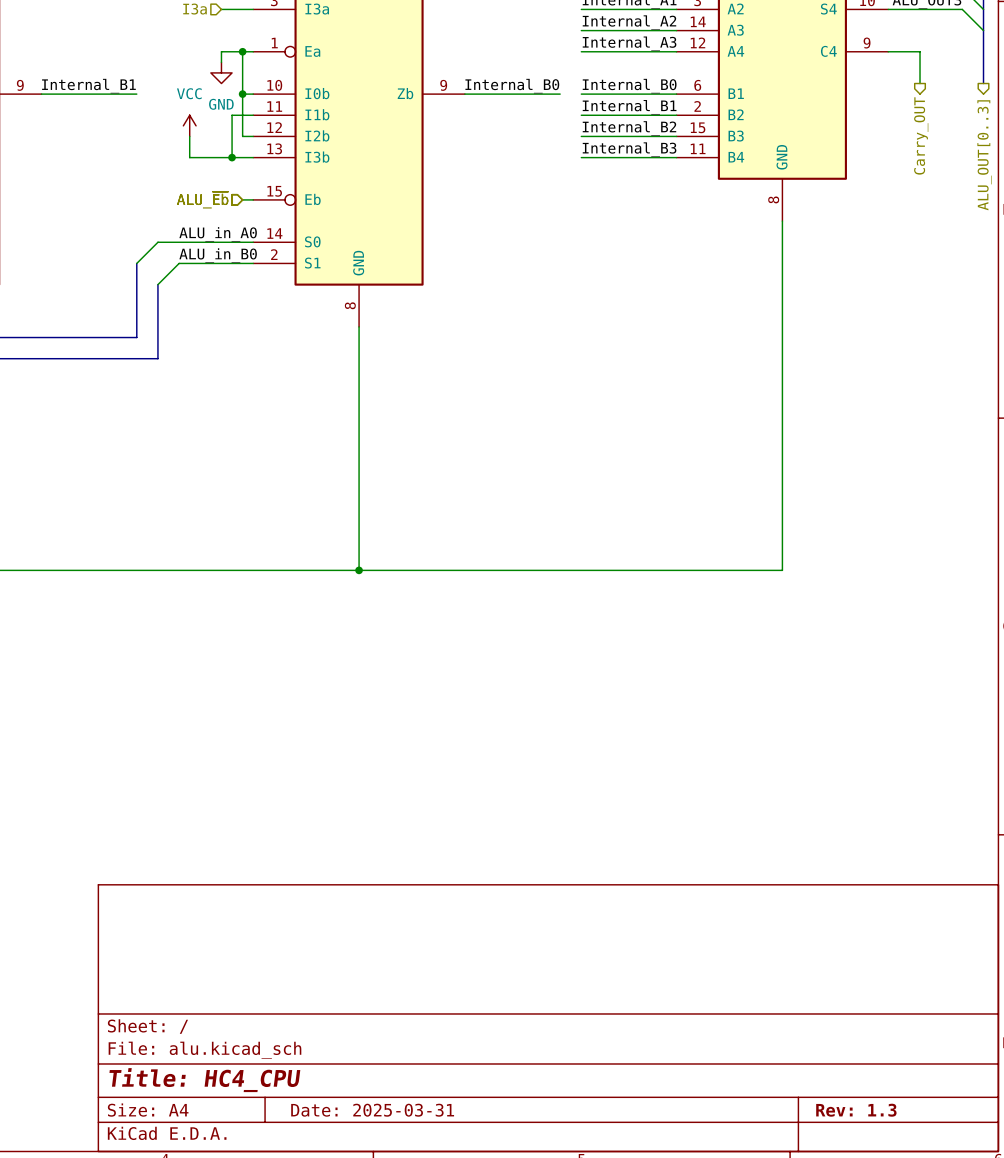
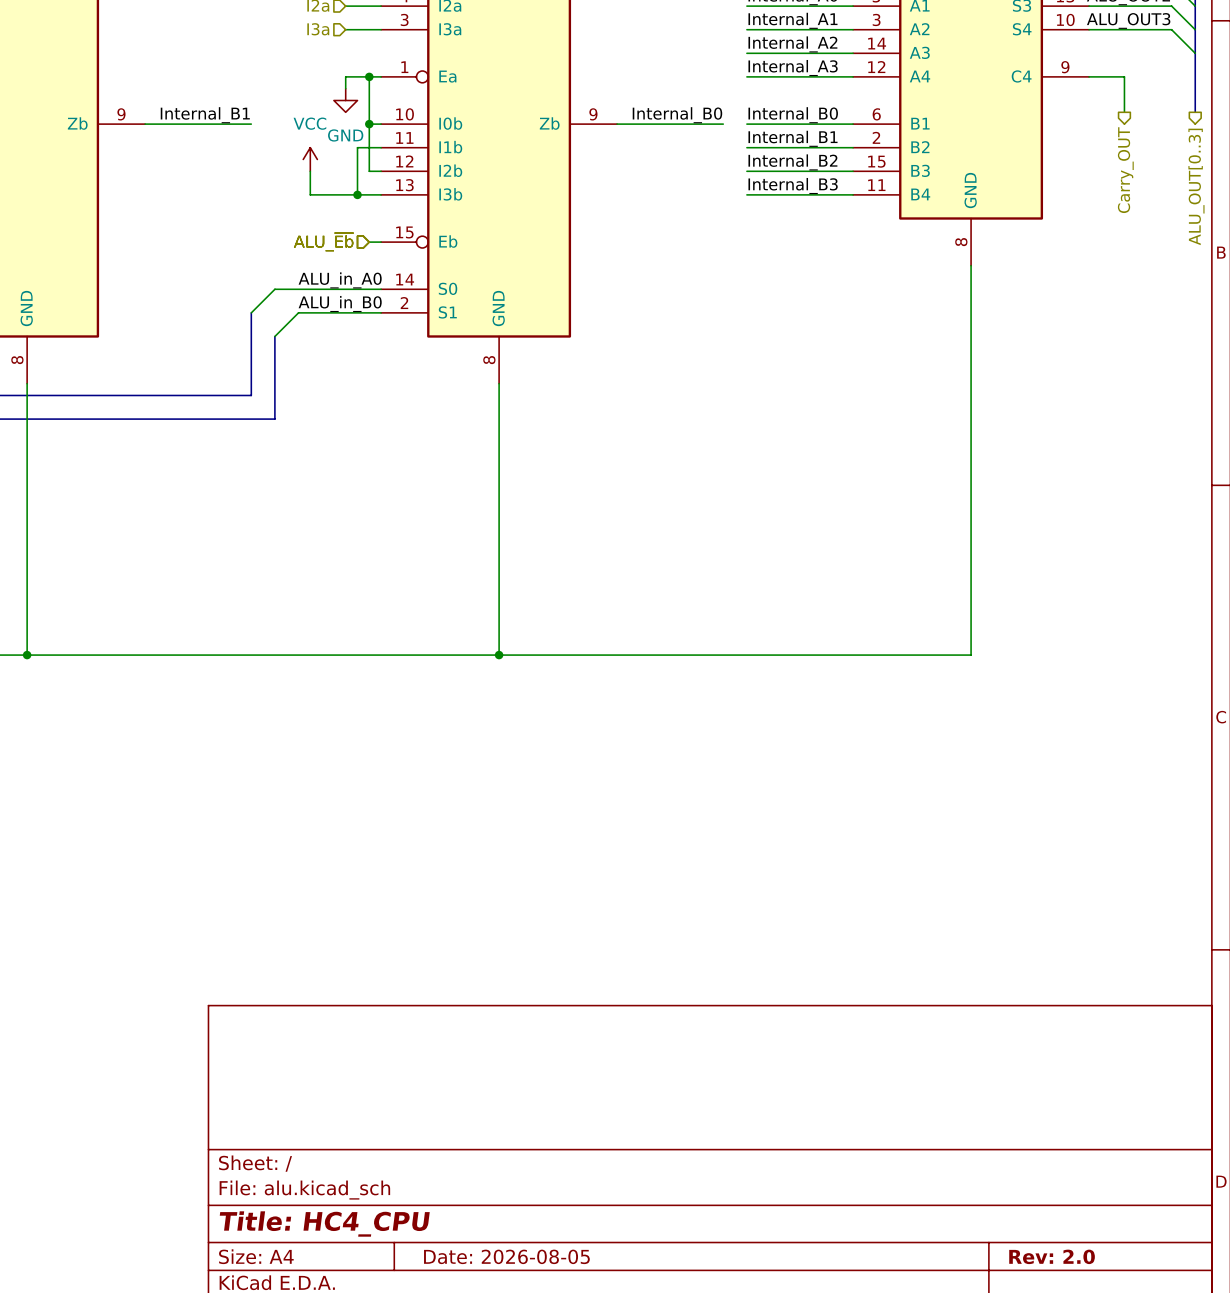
title block: Date: 2025-03-31 (372, 1110) -> Date: 2026-08-05 (506, 1256)
title block: Rev: 1.3 (856, 1110) -> Rev: 2.0 (1052, 1256)

